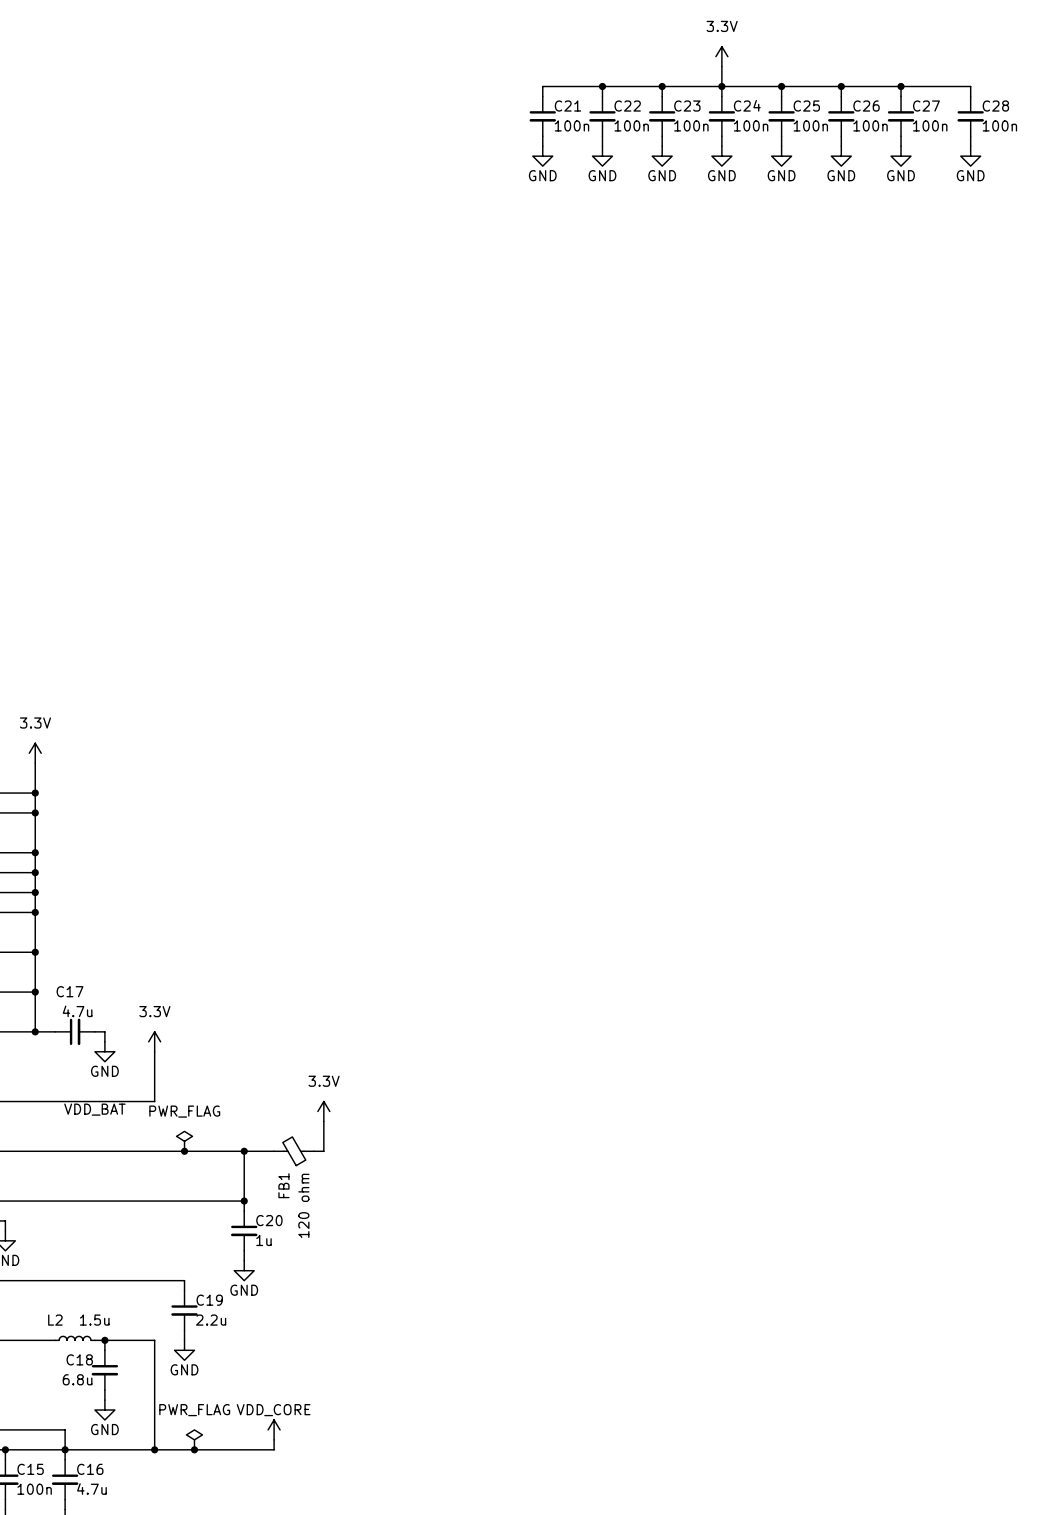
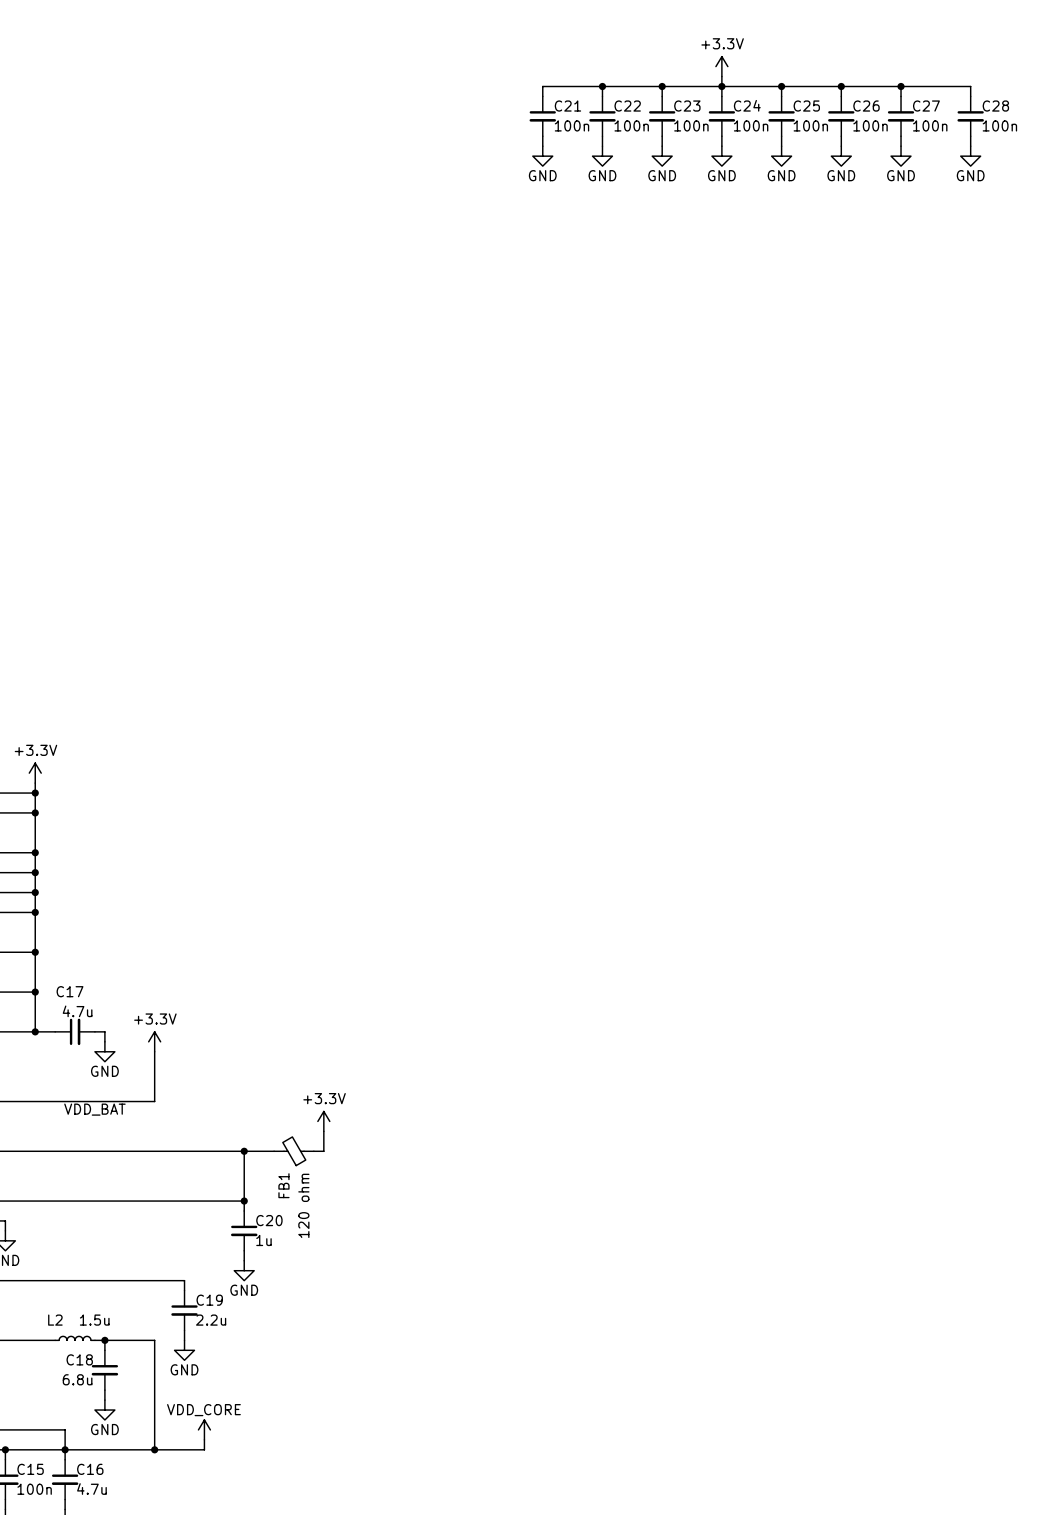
power symbol: 3.3V (721, 56) -> none
power symbol: none -> +3.3V (721, 66)
power symbol: 3.3V (35, 753) -> none
power symbol: none -> +3.3V (35, 773)
power symbol: 3.3V (154, 1041) -> +3.3V (154, 1041)
power symbol: 3.3V (323, 1111) -> none
power symbol: none -> +3.3V (323, 1121)
power symbol: PWR_FLAG (184, 1141) -> none
junction: (184, 1151) -> none
power symbol position: VDD_CORE (274, 1429) -> VDD_CORE (204, 1429)
power symbol: PWR_FLAG (194, 1439) -> none
wire: (274, 1439) (274, 1449) (204, 1449) -> (204, 1439) (204, 1449)
junction: (194, 1449) -> none

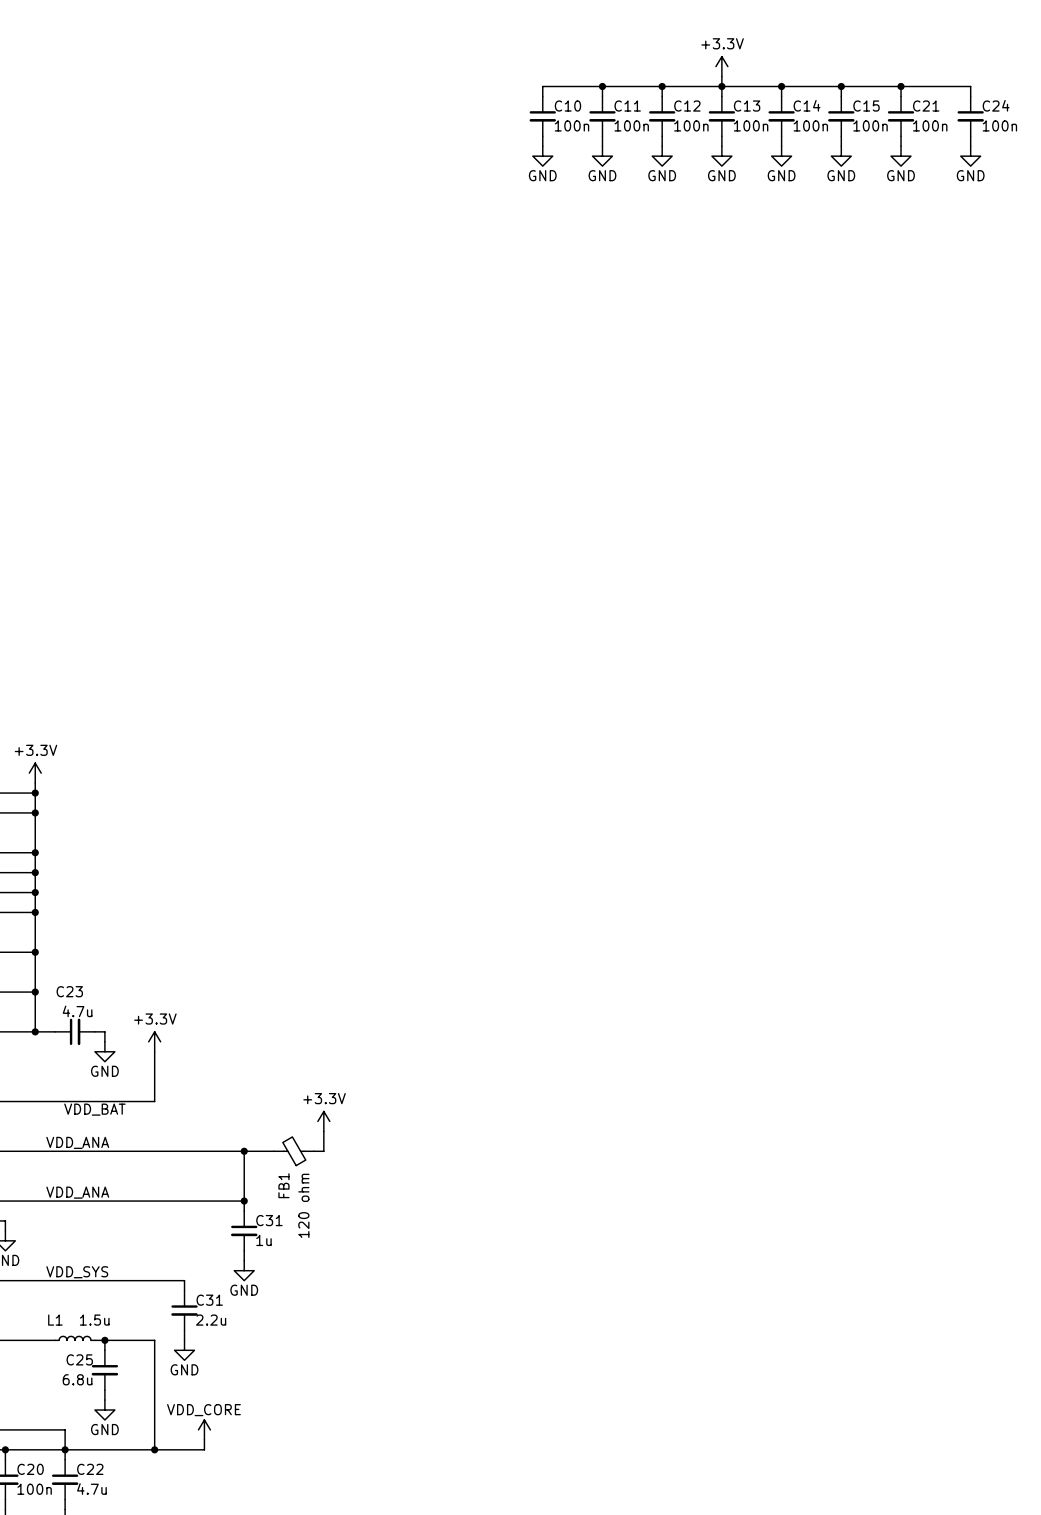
C24 name: C24 (747, 105) -> C13 (747, 106)
C21 name: C21 (567, 106) -> C10 (567, 106)
C22 name: C22 (627, 106) -> C11 (627, 106)
C23 name: C23 (687, 106) -> C12 (687, 106)
C25 name: C25 (806, 106) -> C14 (807, 105)
C26 name: C26 (866, 106) -> C15 (866, 106)
C27 name: C27 (926, 106) -> C21 (926, 106)
C28 name: C28 (995, 106) -> C24 (996, 105)
C17 name: C17 (70, 991) -> C23 (69, 991)
label: none -> VDD_ANA (77, 1142)
label: none -> VDD_ANA (77, 1192)
C20 name: C20 (269, 1220) -> C31 (269, 1220)
label: none -> VDD_SYS (77, 1272)
C19 name: C19 (209, 1300) -> C31 (209, 1300)
L2 name: L2 (55, 1320) -> L1 (55, 1320)
C18 name: C18 (79, 1359) -> C25 (79, 1359)
C15 name: C15 (30, 1469) -> C20 (30, 1469)
C16 name: C16 (90, 1469) -> C22 (90, 1469)

